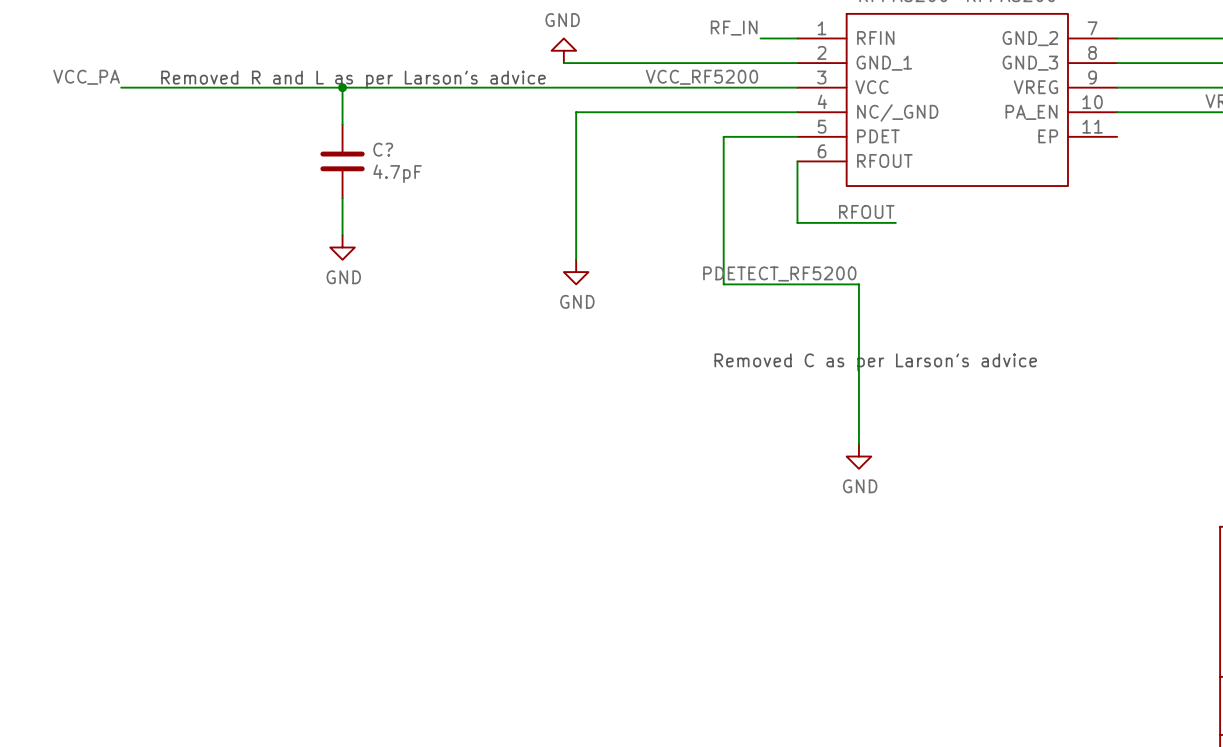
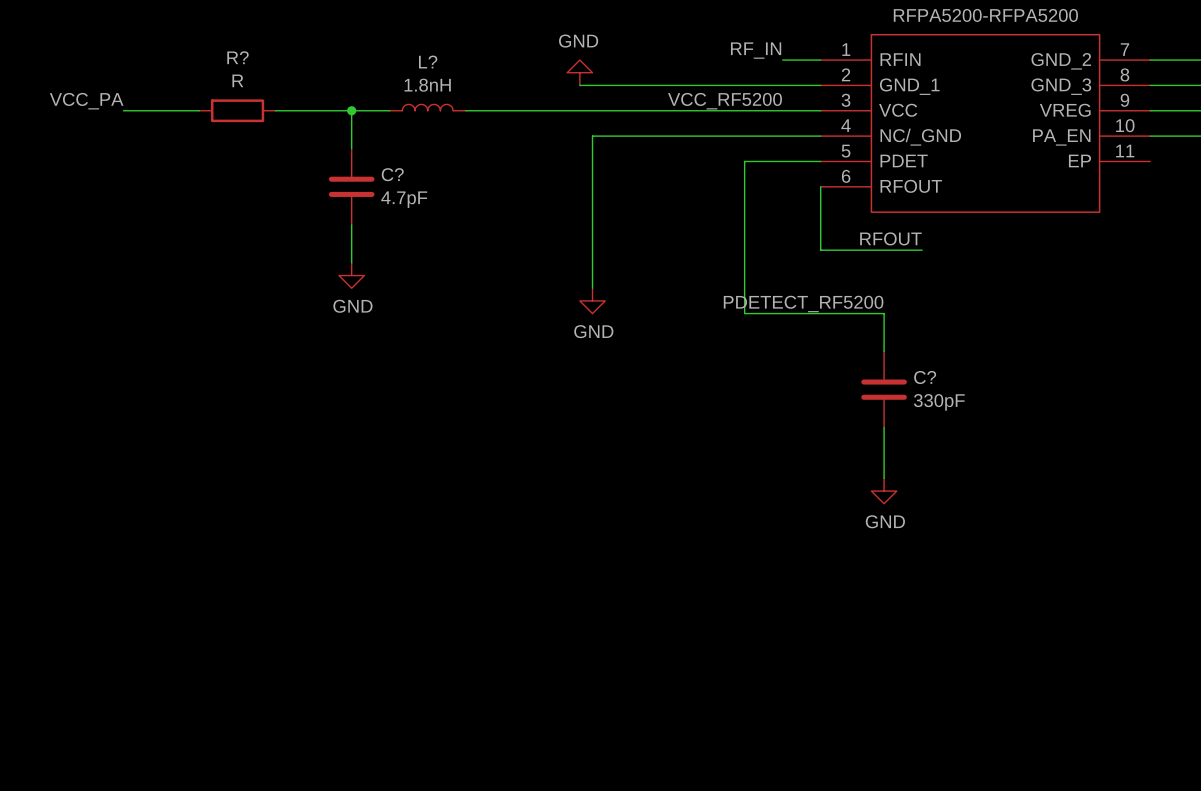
text: Removed R and L as per Larson's advice (353, 79) -> none
L?: none -> 1.8nH (427, 107)
wire: (194, 87) (268, 87) -> none
R?: none -> R (237, 110)
wire: (379, 87) (453, 87) -> none
C?: none -> 330pF (884, 389)
text: Removed C as per Larson's advice (875, 362) -> none

